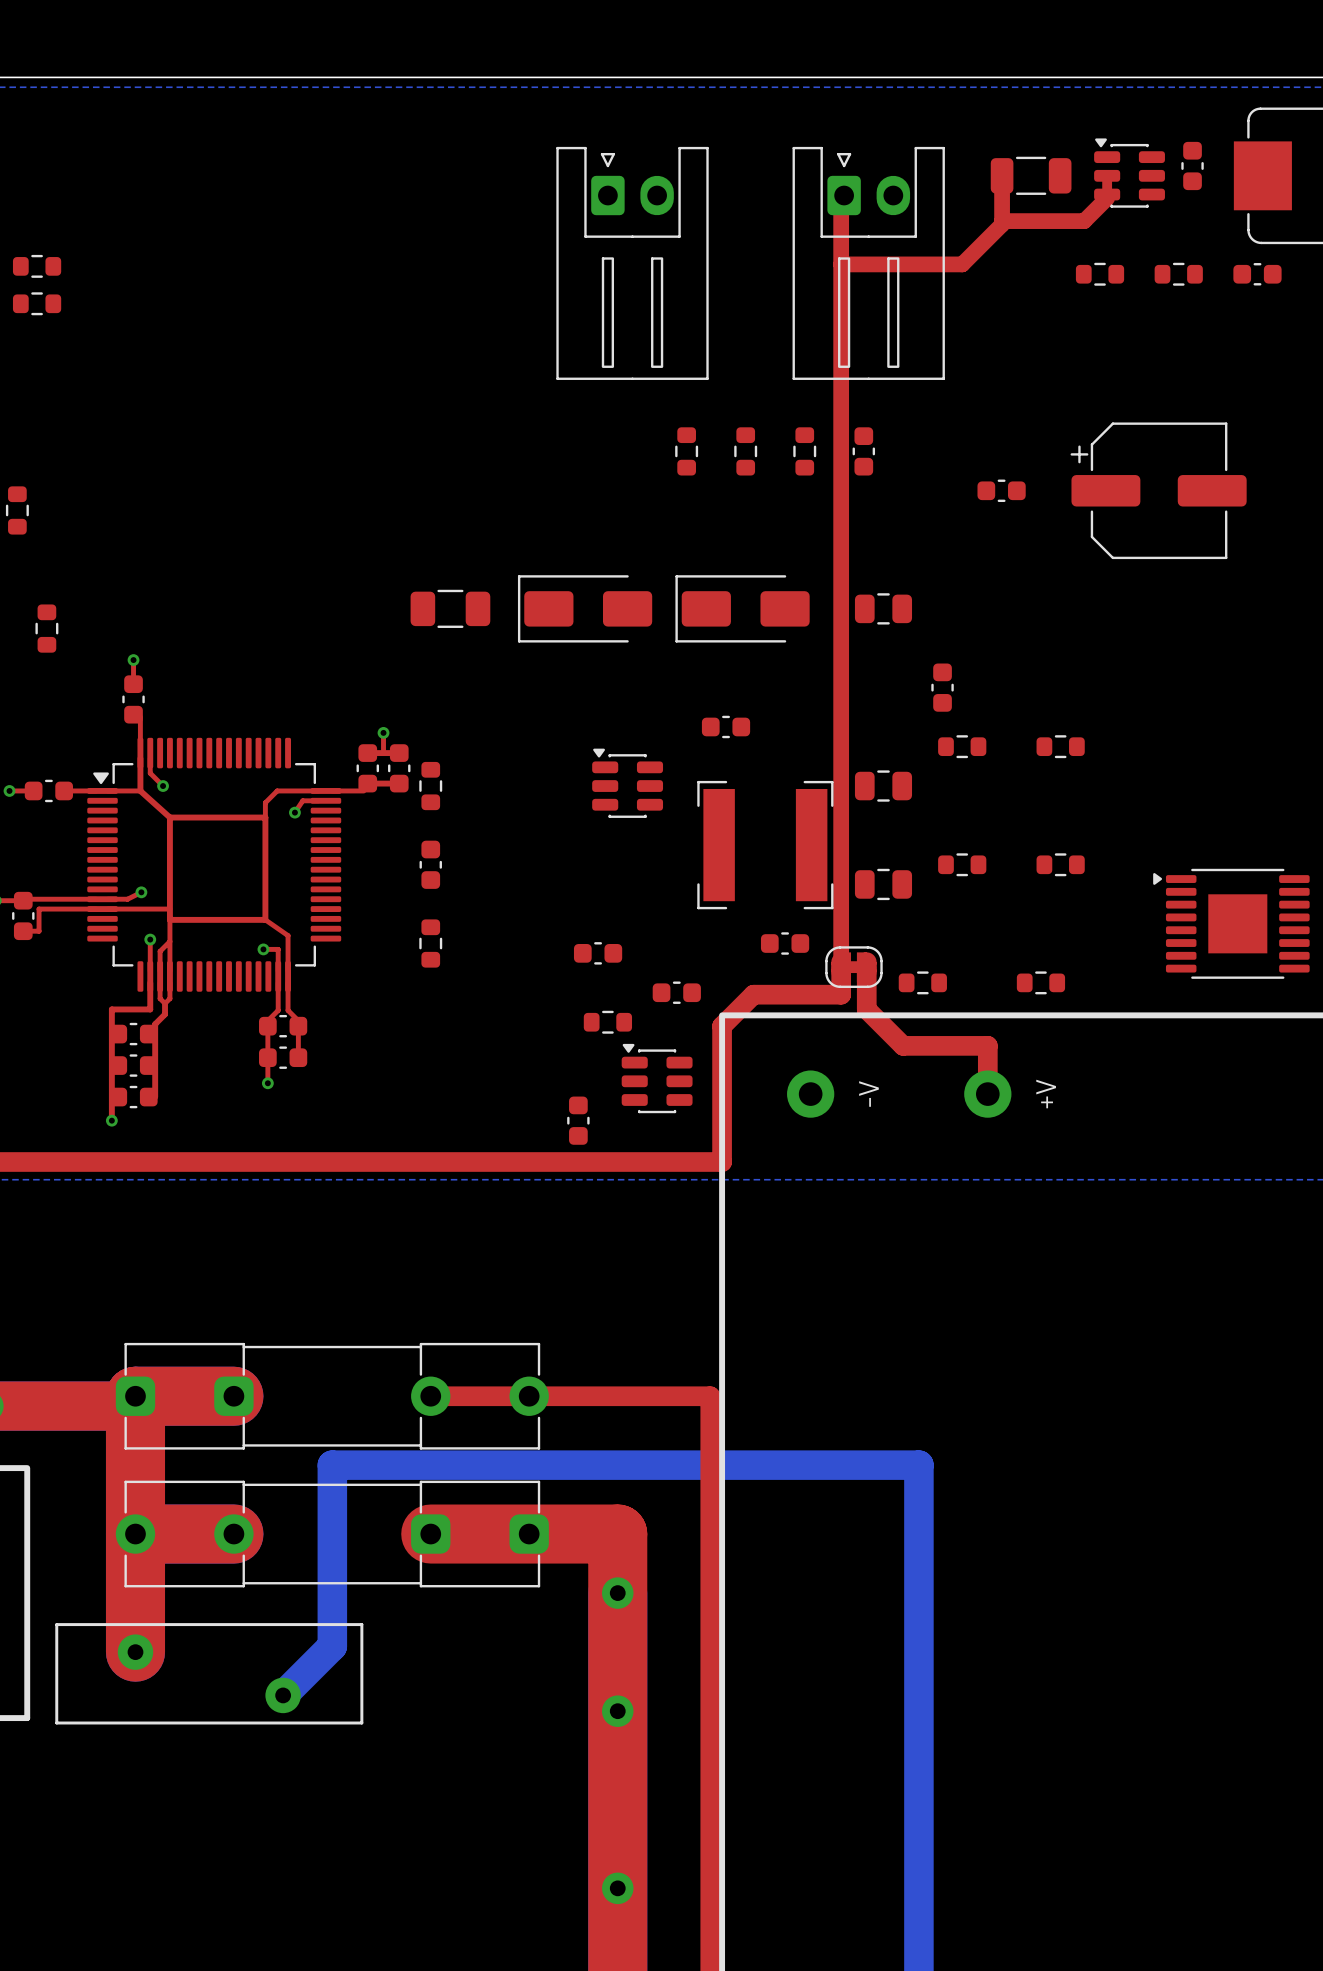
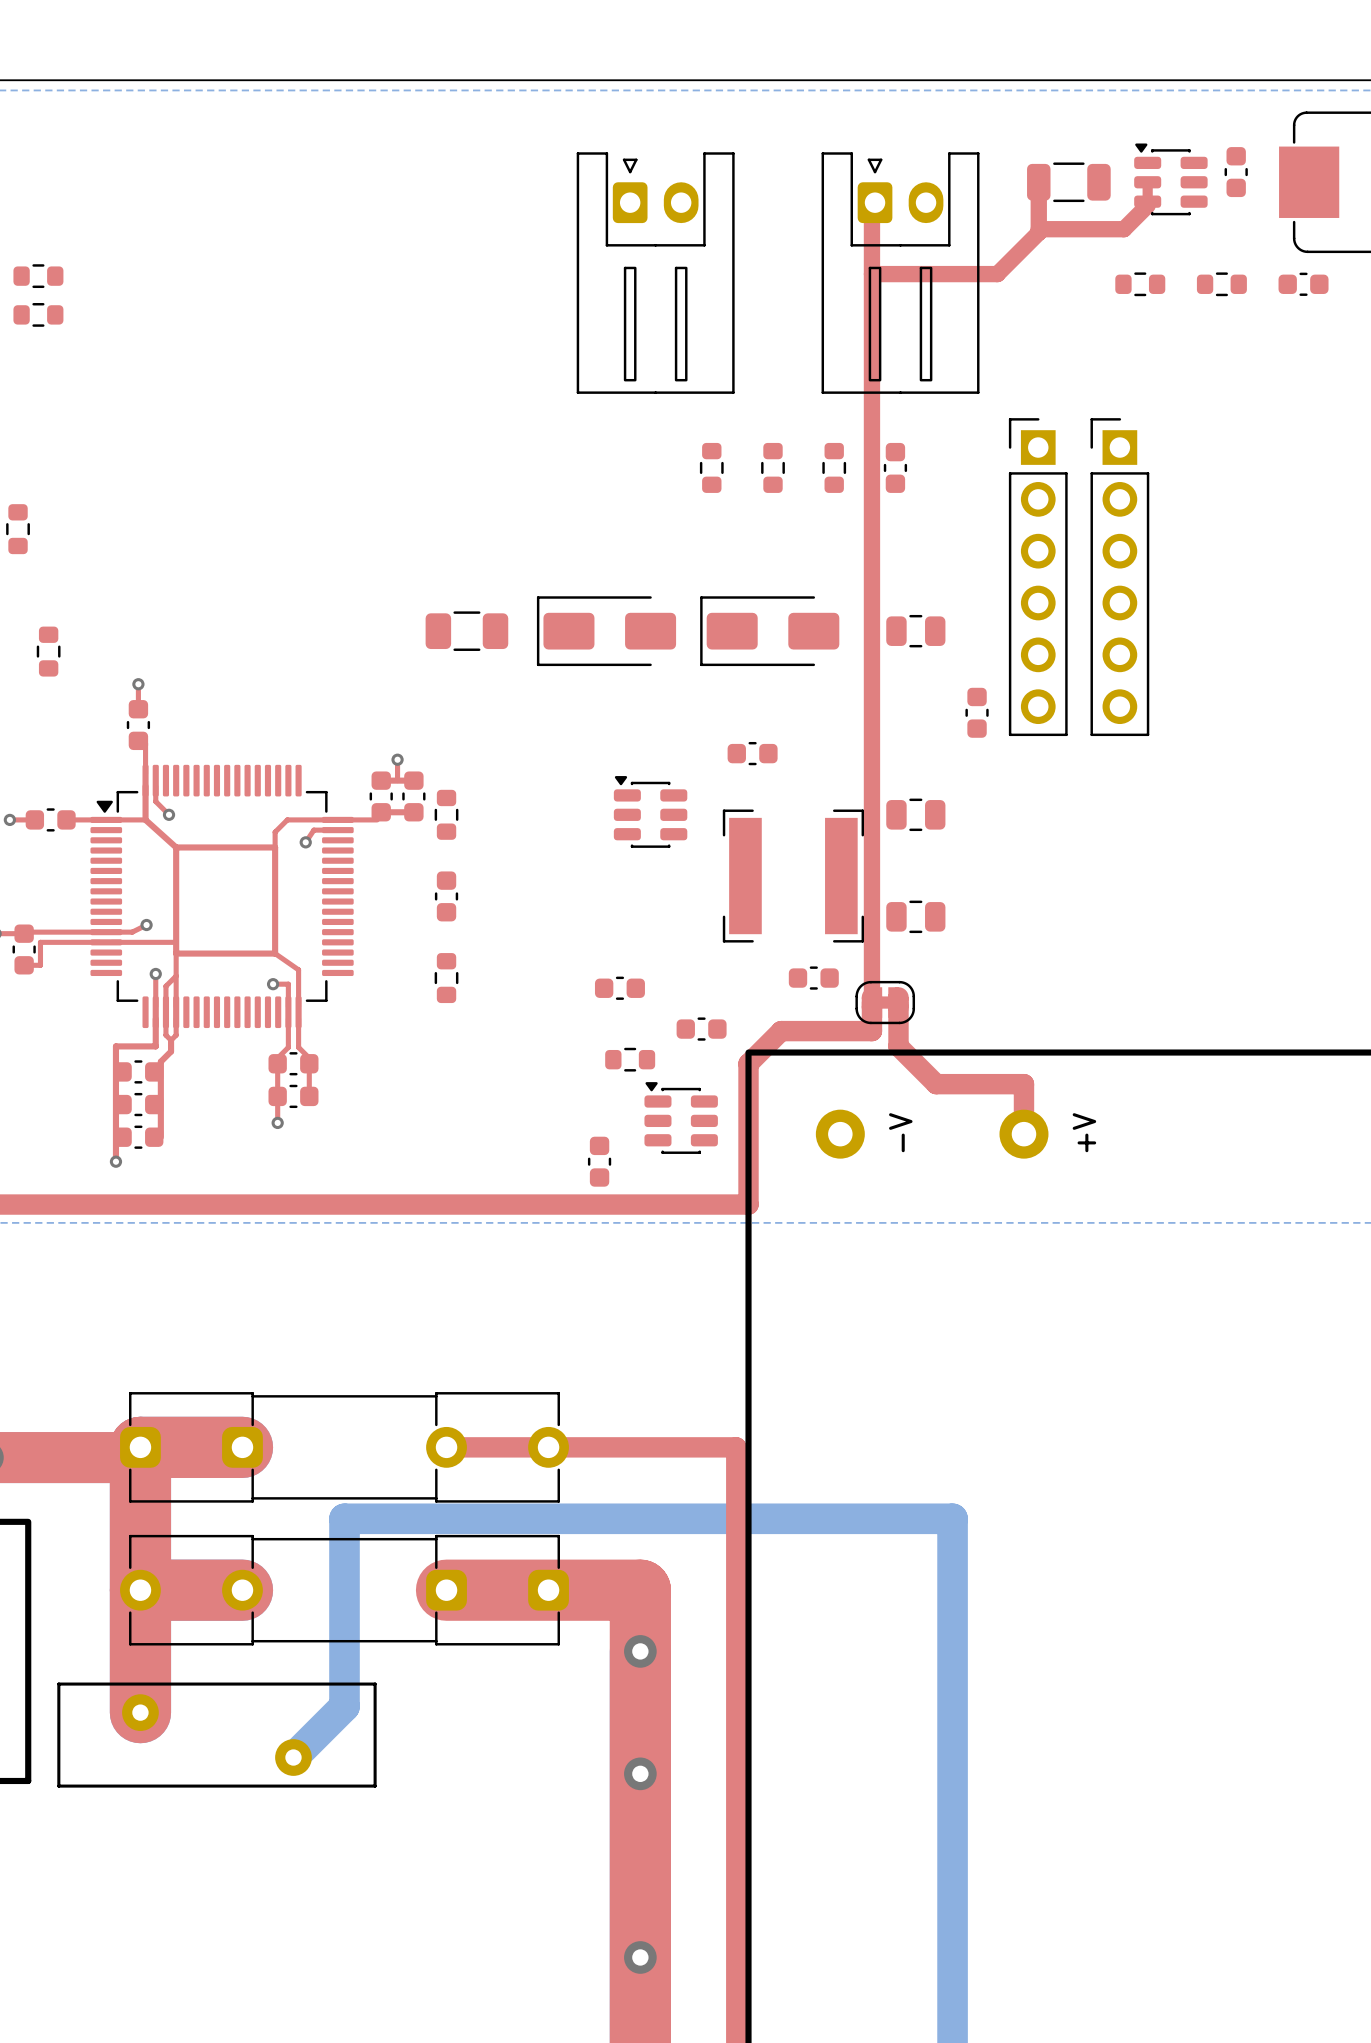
part: (1001, 490) -> none
part: (1158, 490) -> none
part: none -> (1038, 577)
part: none -> (1119, 577)
part: (962, 746) -> none
part: (1060, 746) -> none
part: (962, 864) -> none
part: (1060, 864) -> none
part: (1231, 923) -> none
part: (922, 982) -> none
part: (1040, 982) -> none

